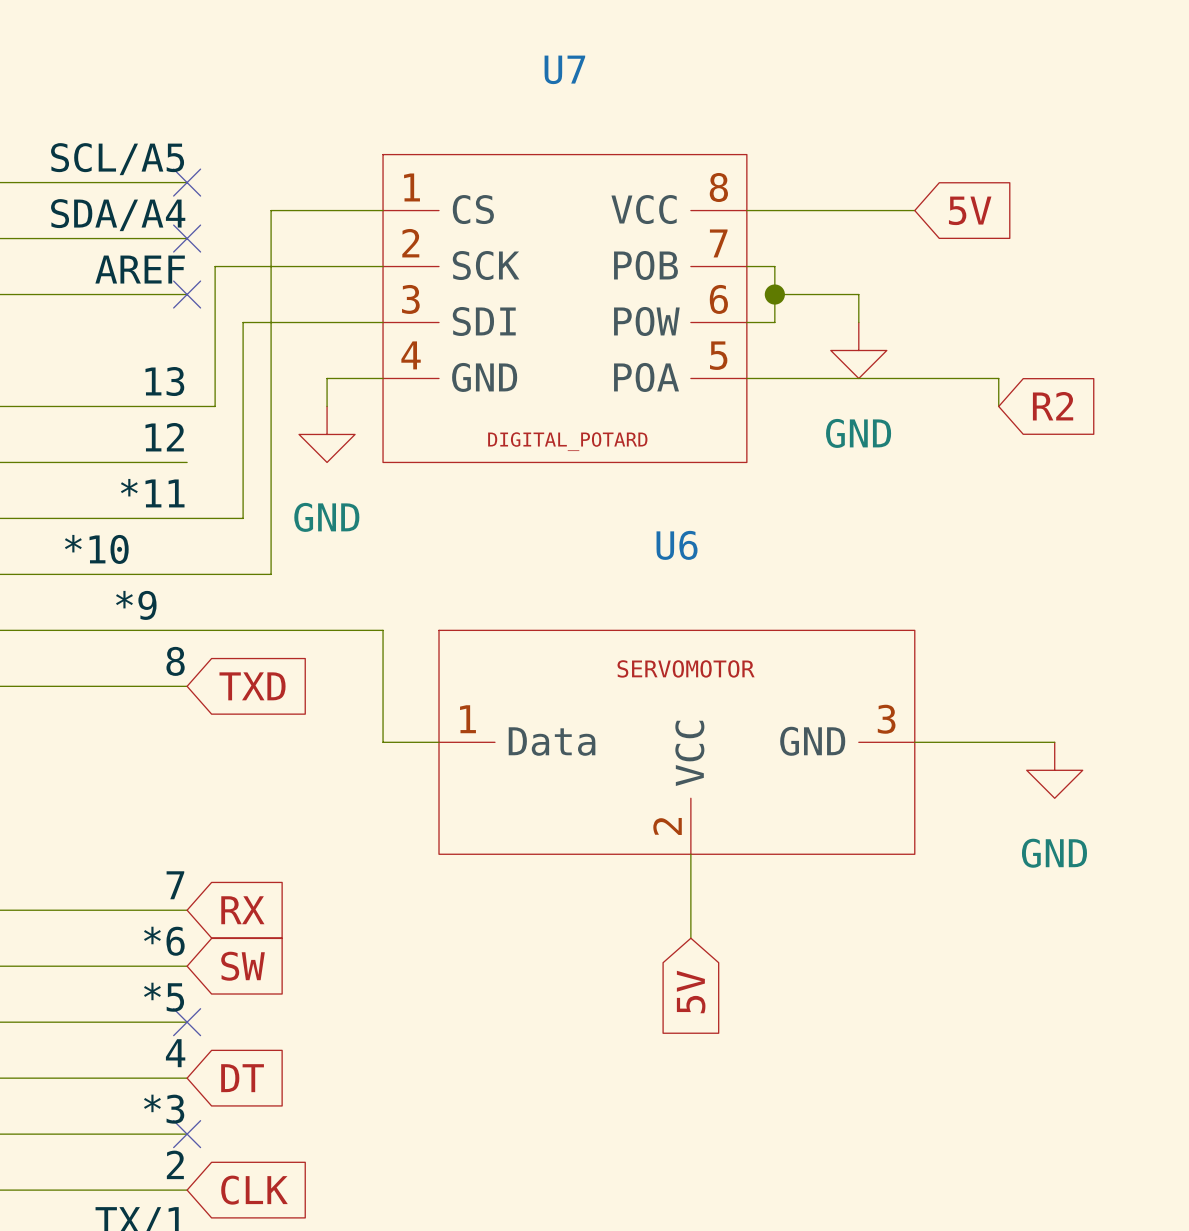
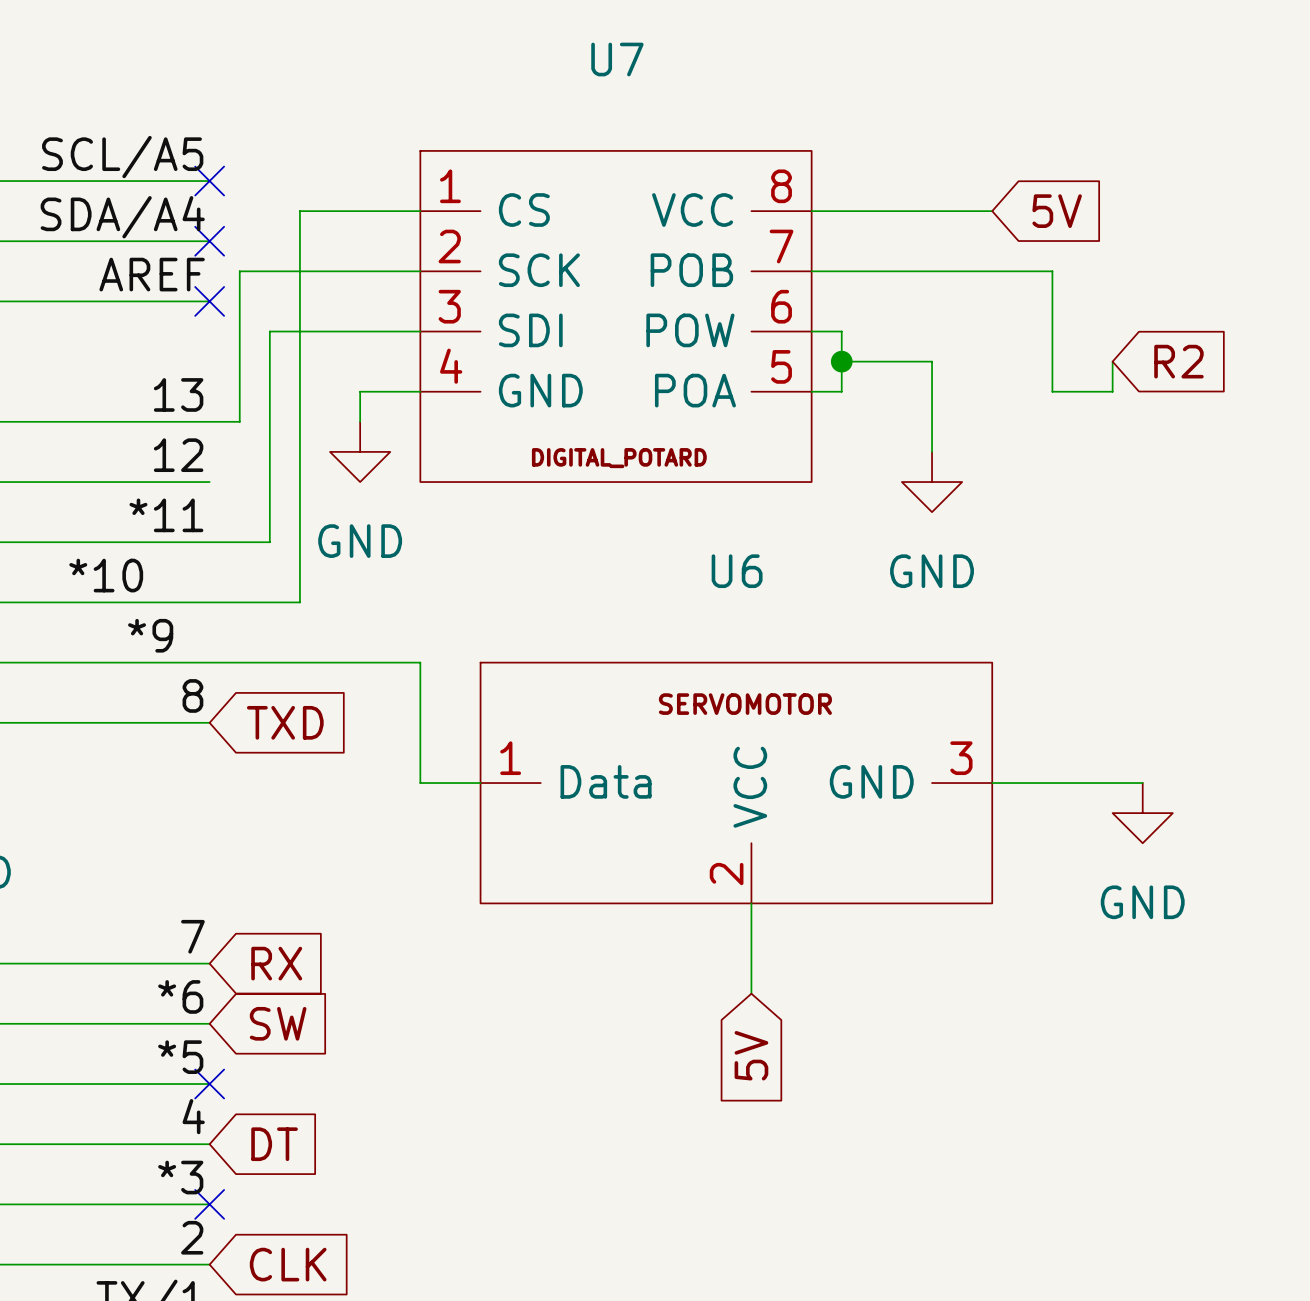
wire: (774, 266) (774, 322) -> (841, 391) (841, 331)
wire: (774, 294) (858, 294) (858, 322) -> none
junction position: (774, 294) -> (841, 361)
wire: none -> (841, 361) (932, 361) (932, 451)
power symbol position: GND (858, 350) -> GND (932, 482)
wire: (774, 378) (970, 378) -> (841, 271) (1052, 271) (1052, 391)
wire: (998, 378) (998, 406) -> (1082, 391) (1112, 391) (1112, 361)
global label position: R2 (1053, 406) -> R2 (1178, 361)

